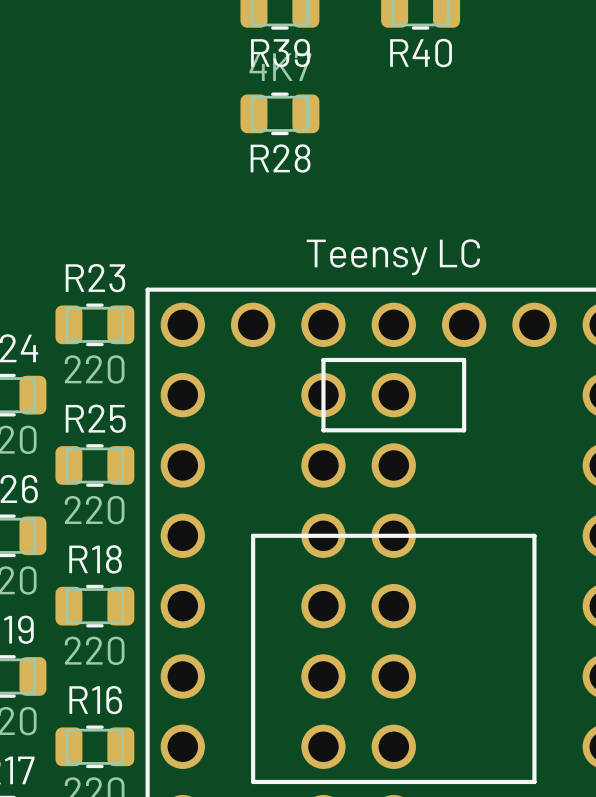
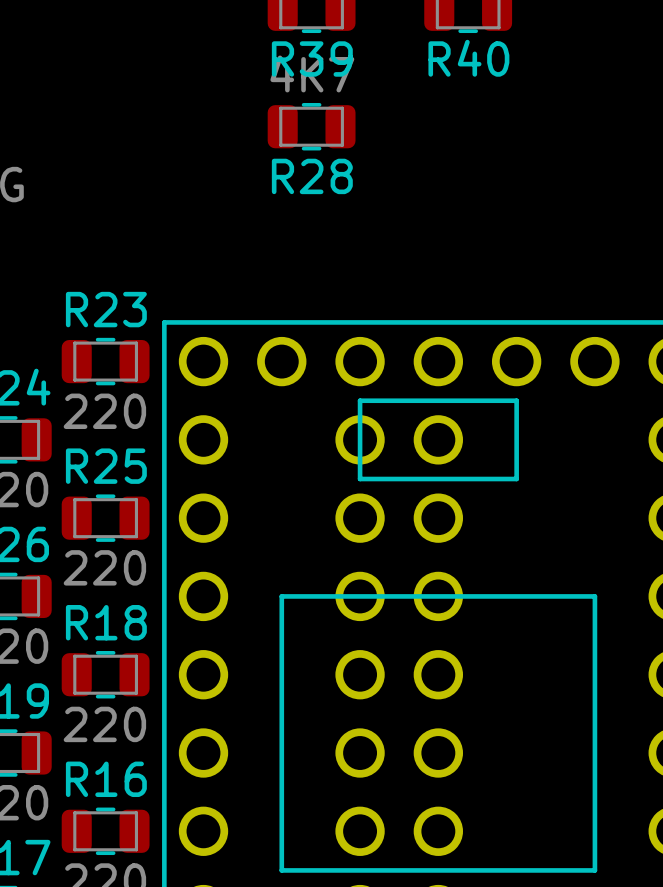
text: Teensy LC (393, 257) -> none

